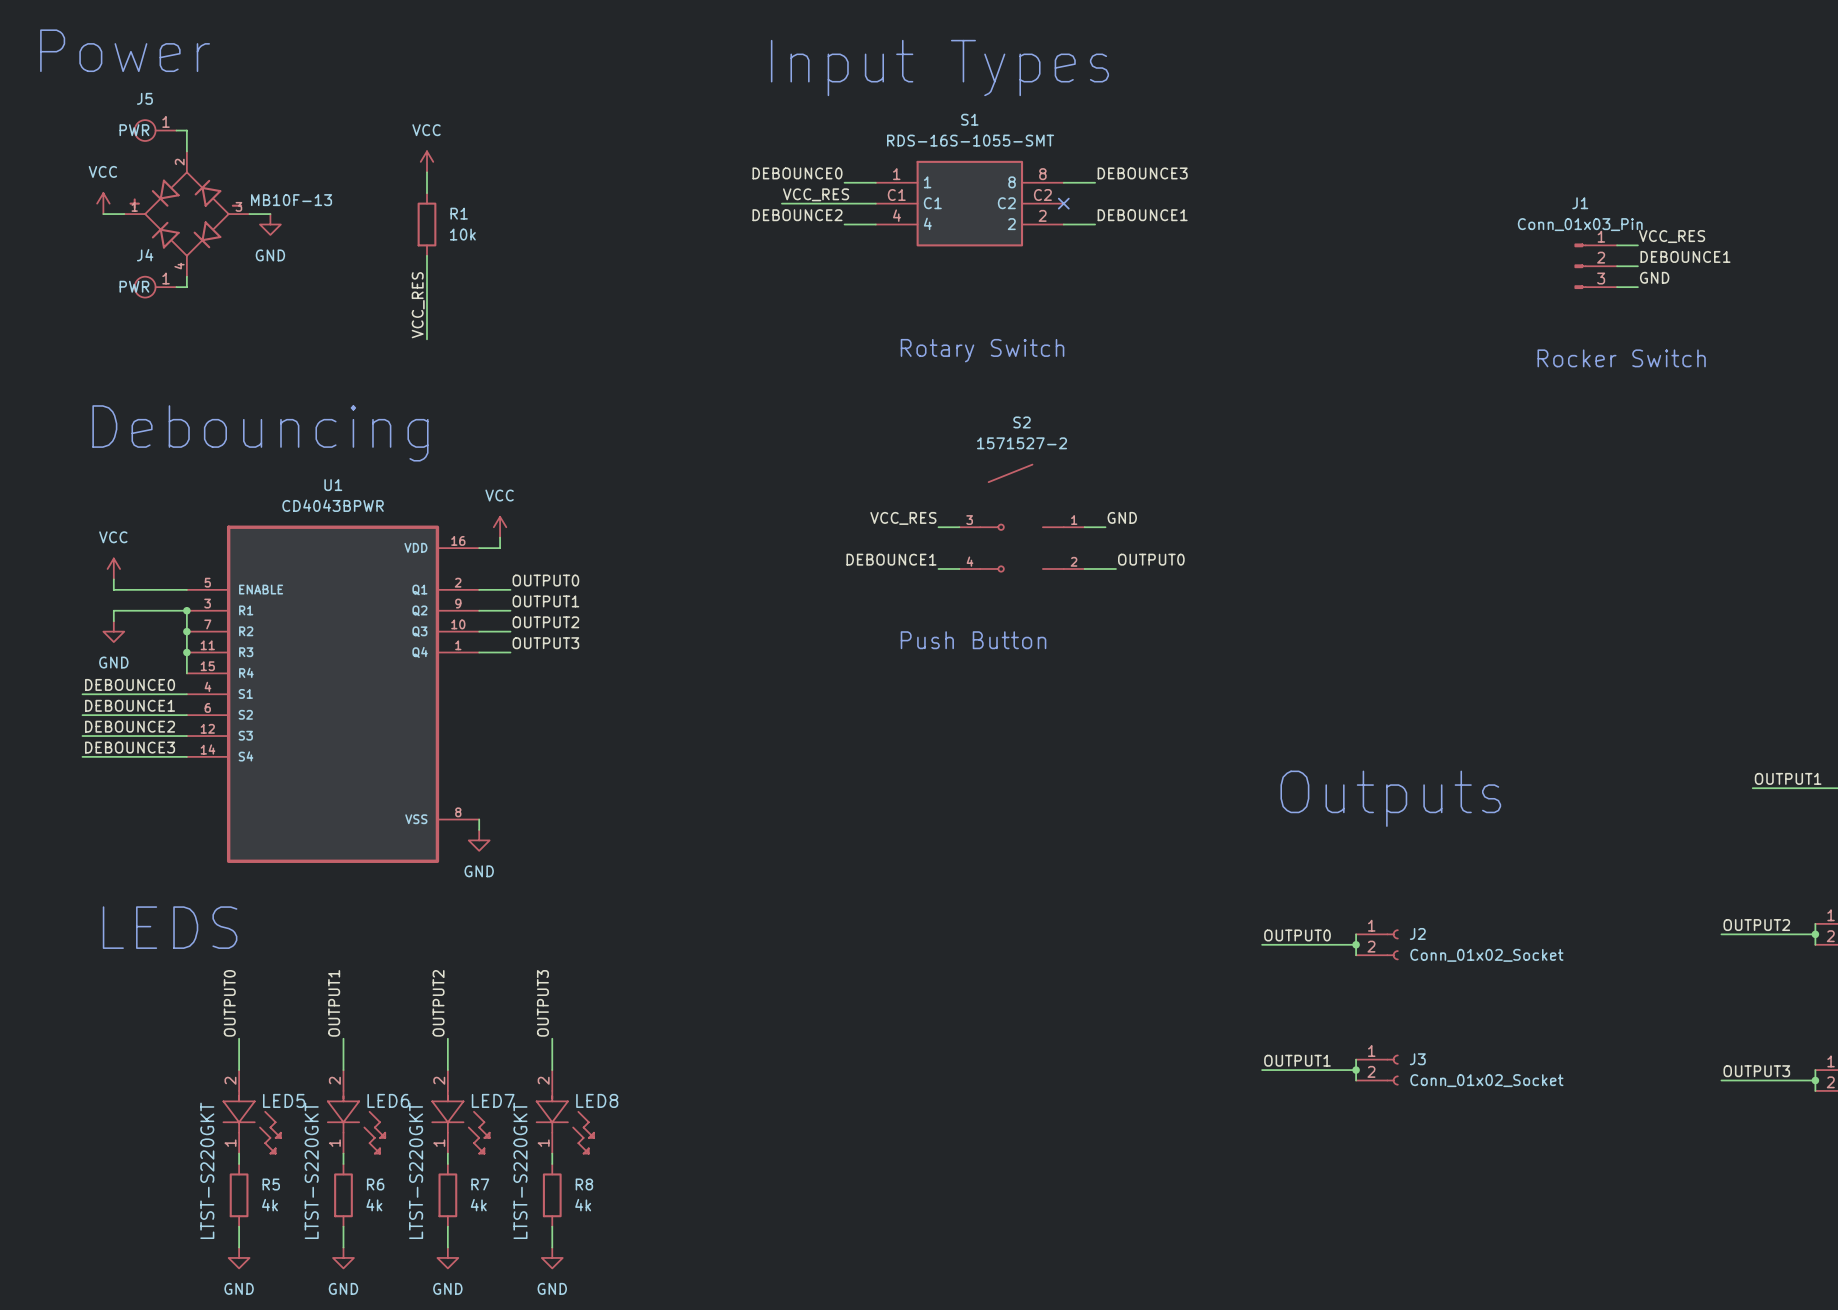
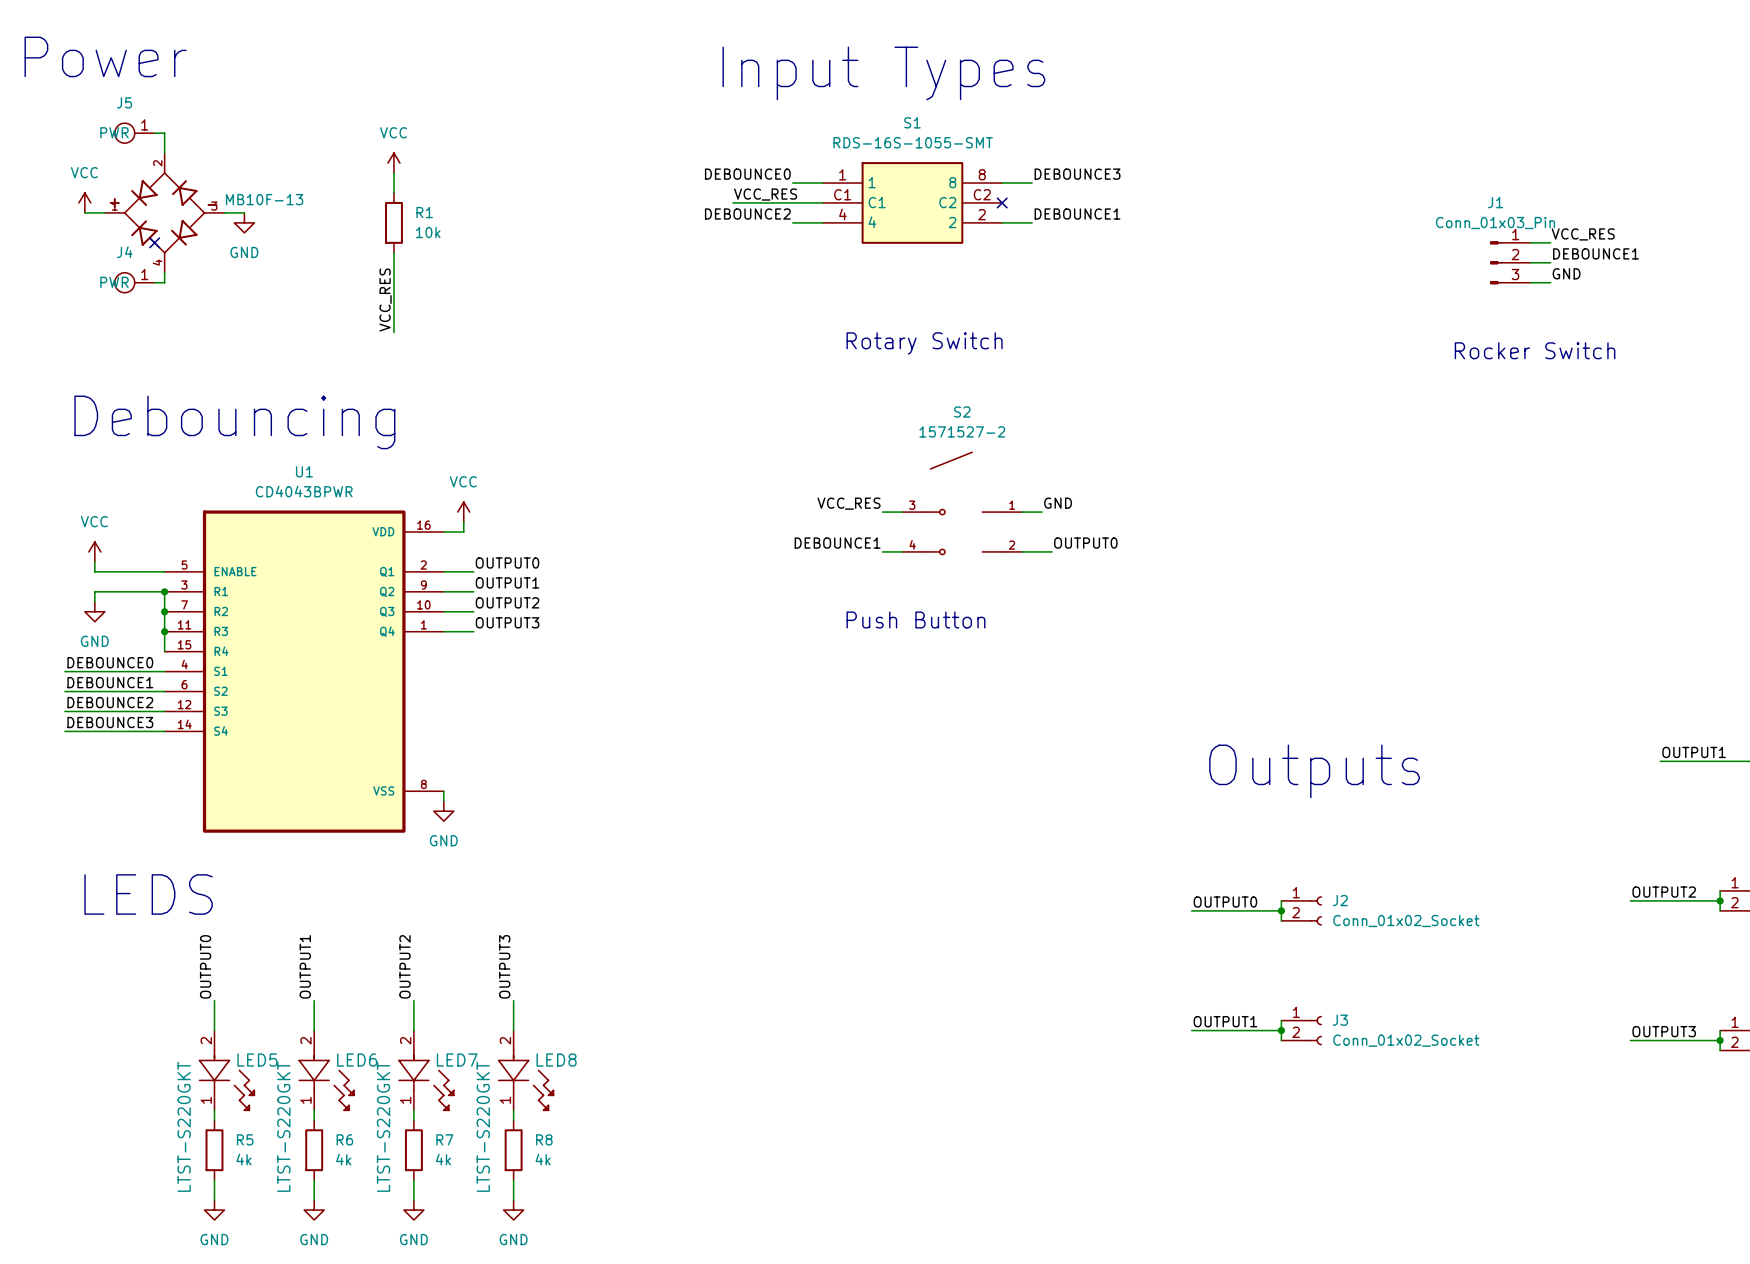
no-connect mark: none -> (154, 242)

